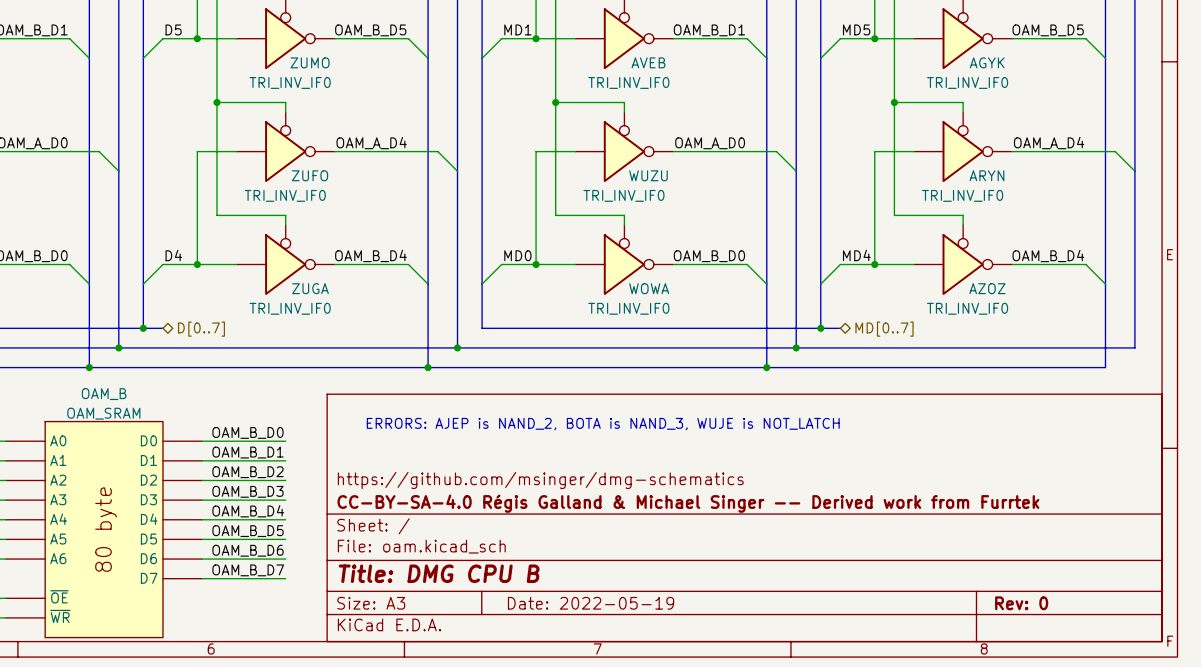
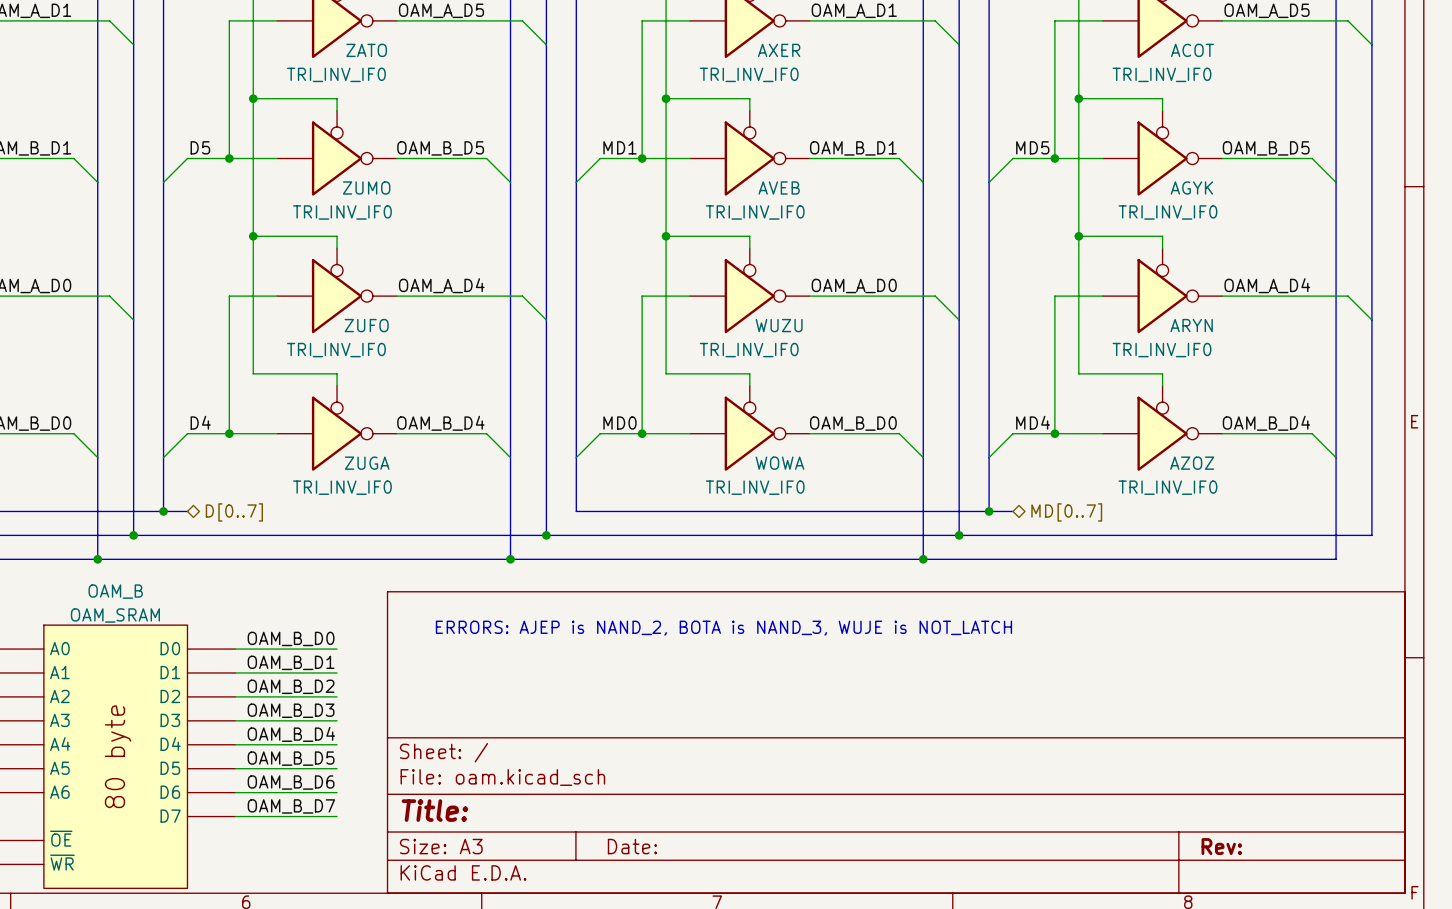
title block: https://github.com/msinger/dmg-schematics (540, 480) -> none
title block: CC-BY-SA-4.0 Régis Galland & Michael Singer -- Derived work from Furrtek (688, 503) -> none
title block: Title: DMG CPU B (439, 573) -> Title: (434, 810)
title block: Date: 2022-05-19 (591, 603) -> Date: (632, 846)
title block: Rev: 0 (1021, 603) -> Rev: (1221, 846)

